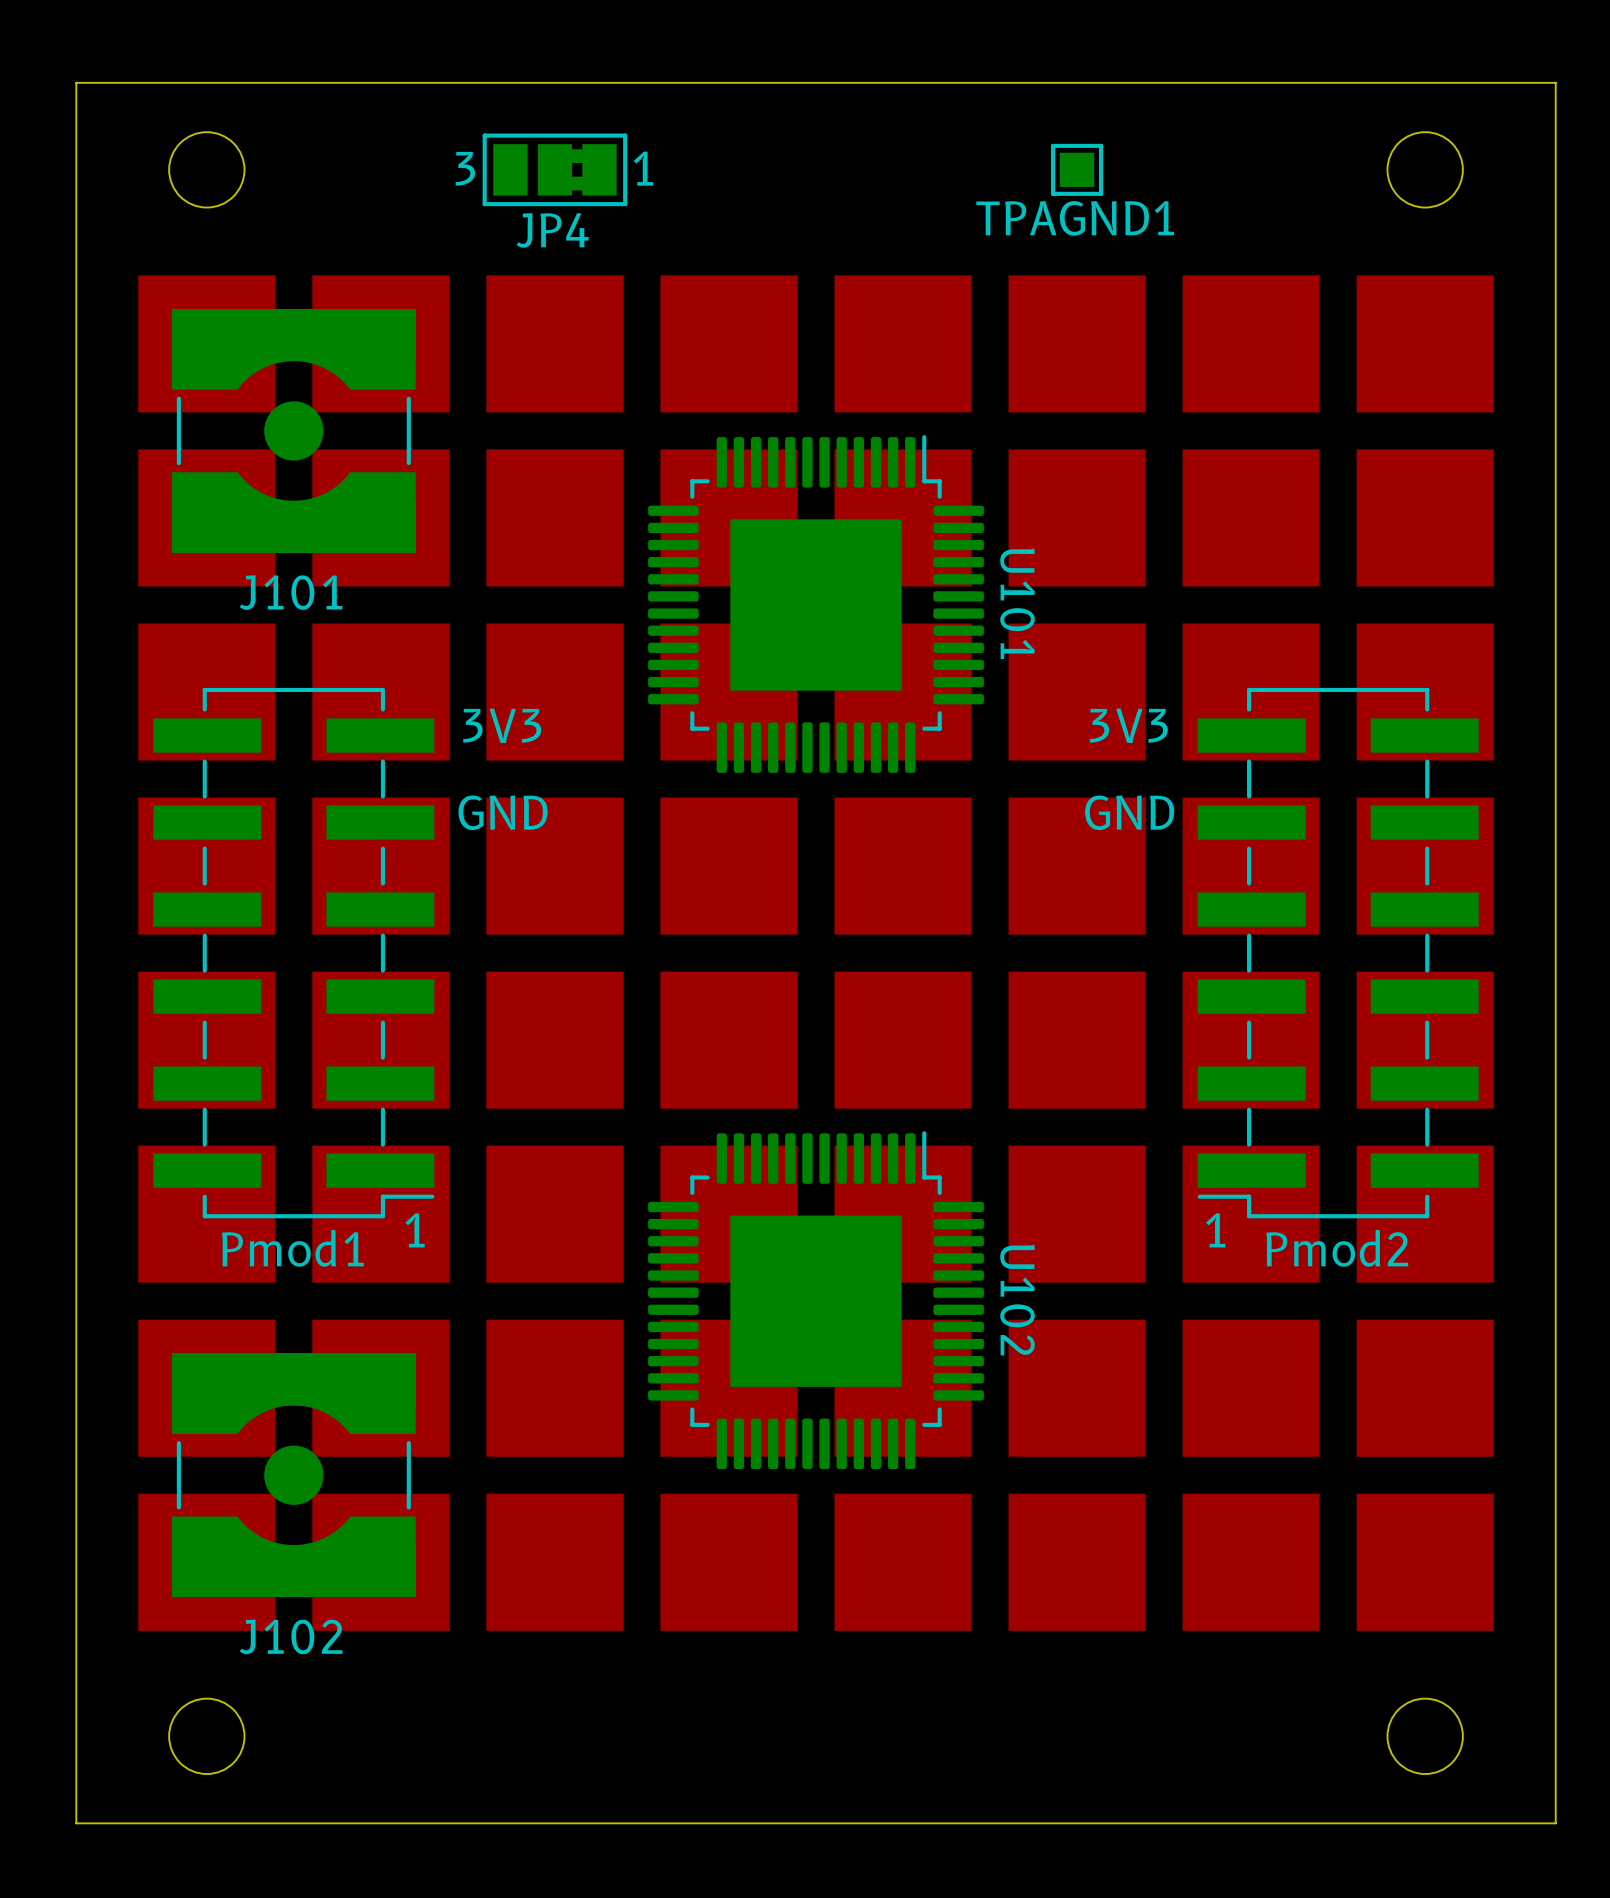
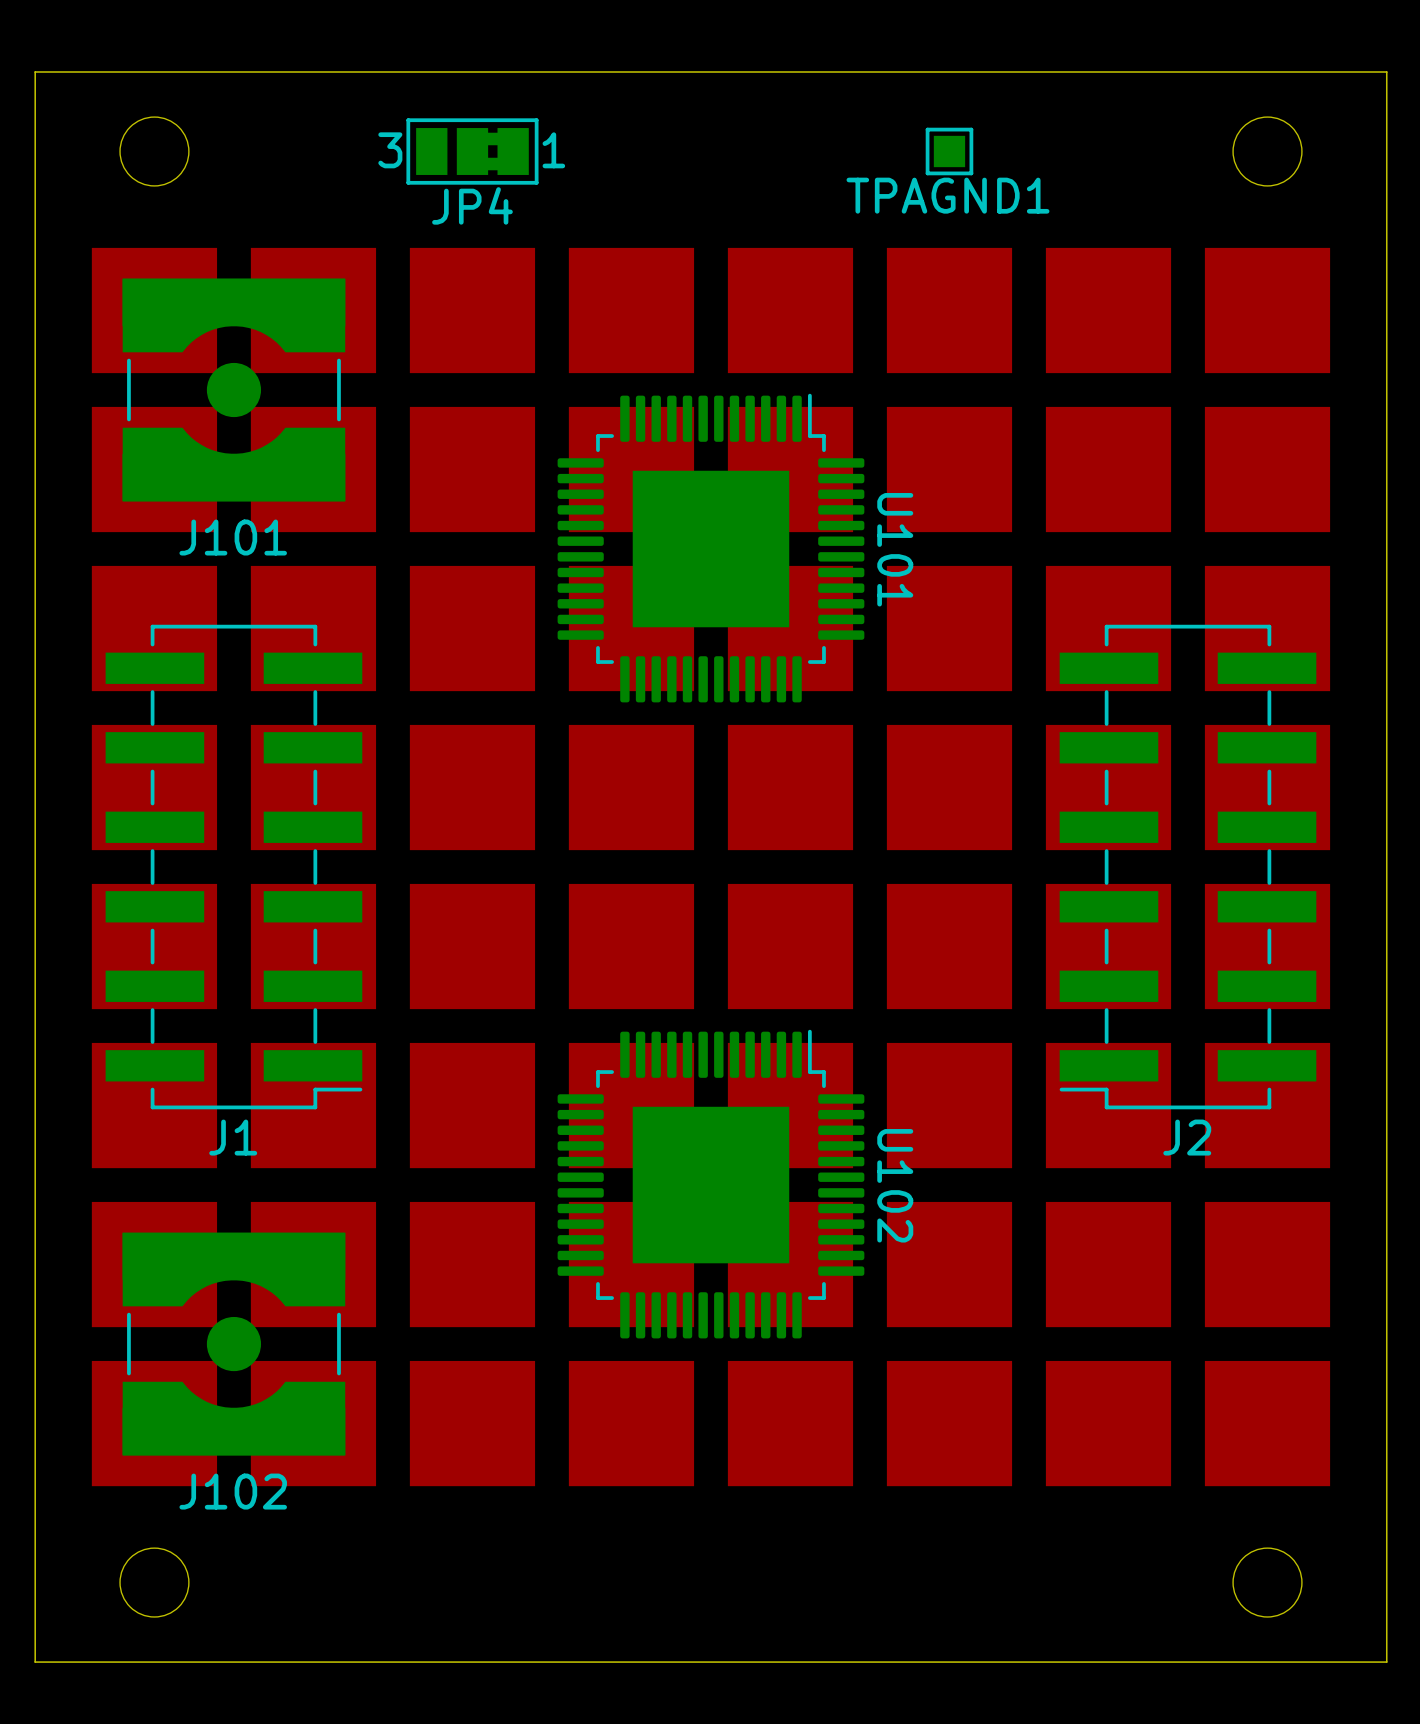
Pmod1 text: 3V3 (502, 725) -> none
Pmod2 text: 3V3 (1128, 725) -> none
Pmod1 text: GND (503, 812) -> none
Pmod2 text: GND (1129, 812) -> none
Pmod1 text: 1 (415, 1230) -> none
Pmod2 text: 1 (1215, 1230) -> none
Pmod1 name: Pmod1 (292, 1248) -> J1 (233, 1137)
Pmod2 name: Pmod2 (1337, 1248) -> J2 (1187, 1137)

